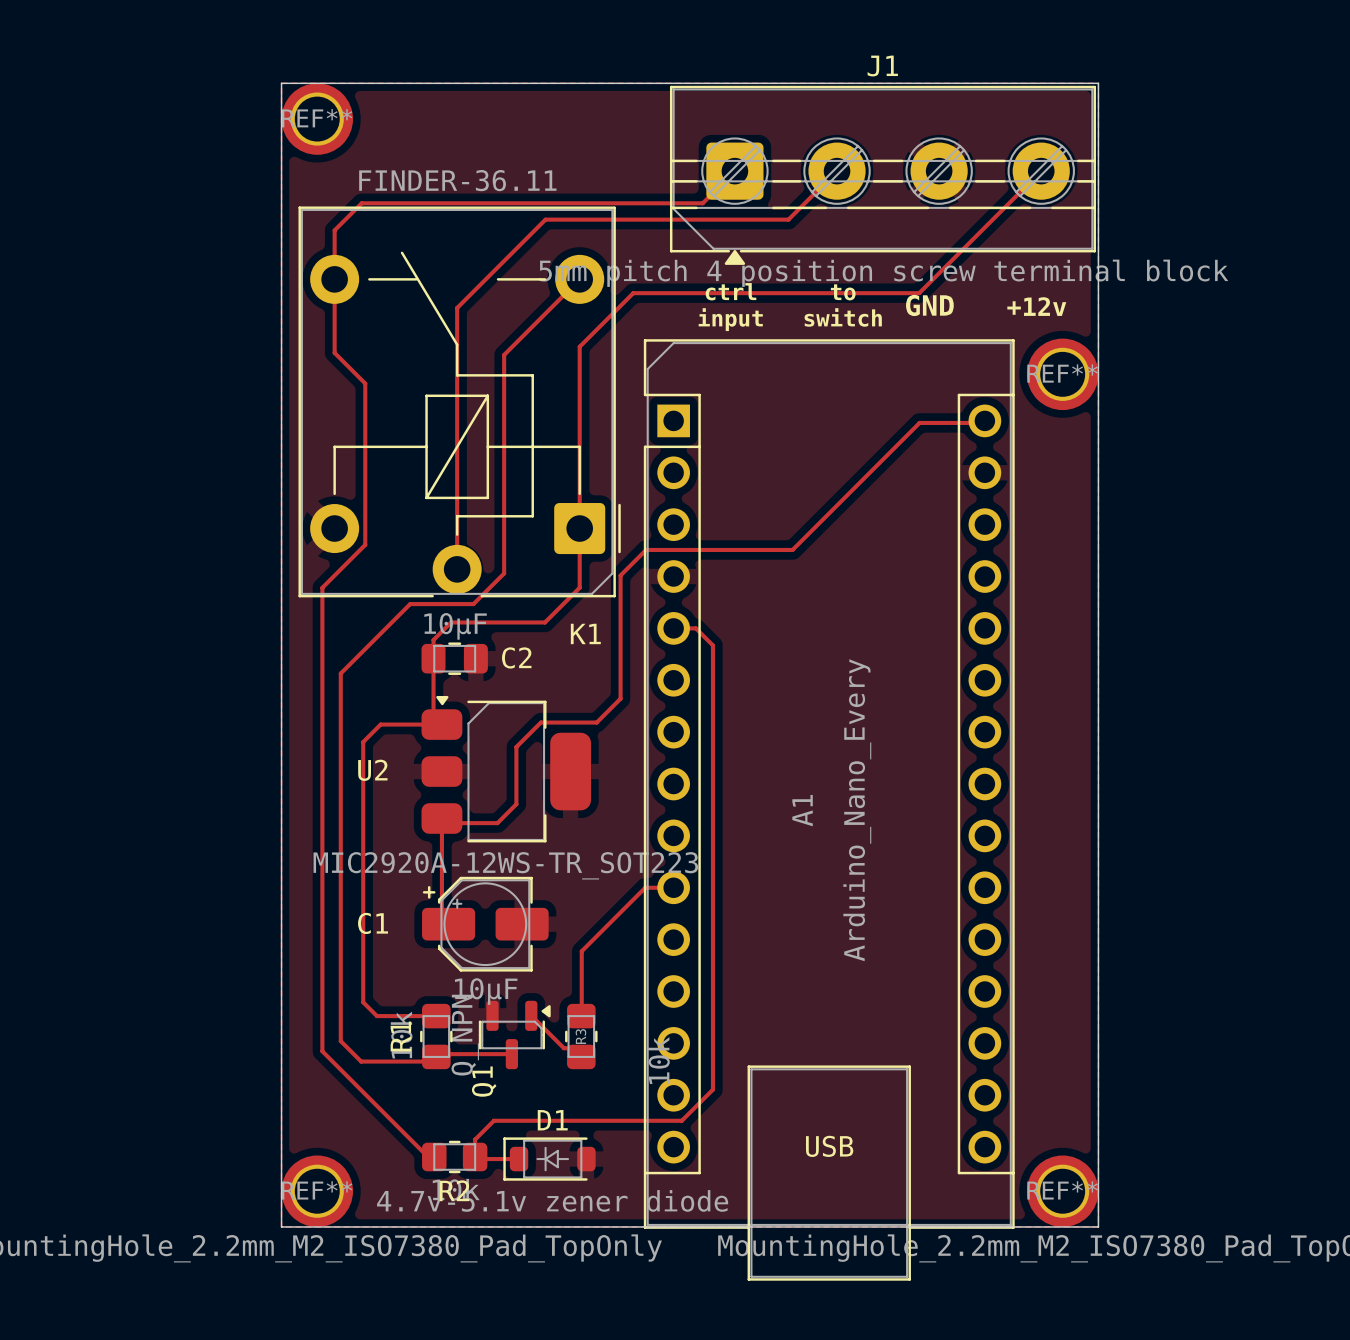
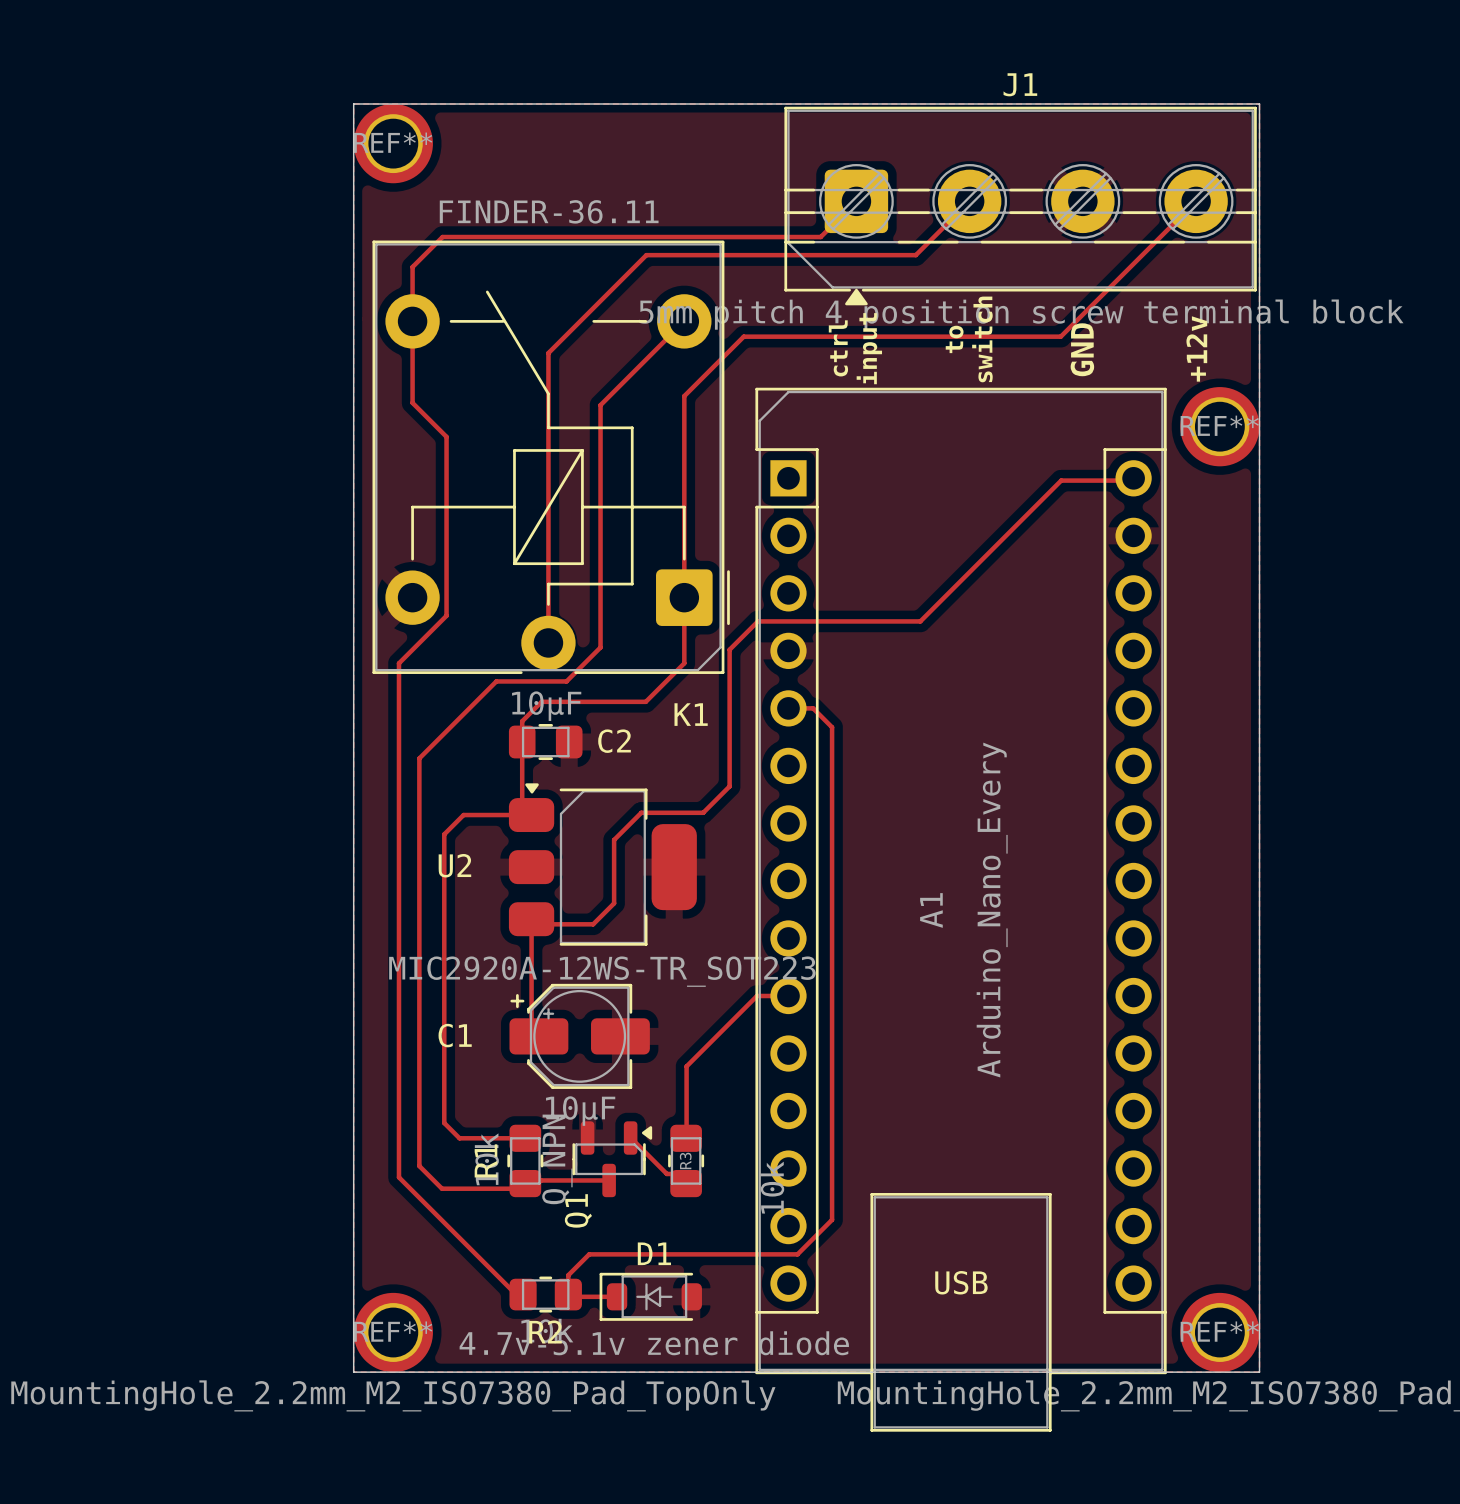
text rotation: 0° (730, 291) -> 90° counterclockwise (838, 348)
text rotation: 0° (843, 292) -> 90° counterclockwise (954, 339)
text rotation: 0° (929, 305) -> 90° counterclockwise (1082, 349)
text rotation: 0° (1036, 306) -> 90° counterclockwise (1196, 348)
text rotation: 0° (843, 317) -> 90° counterclockwise (982, 339)
text rotation: 0° (730, 319) -> 90° counterclockwise (869, 348)

